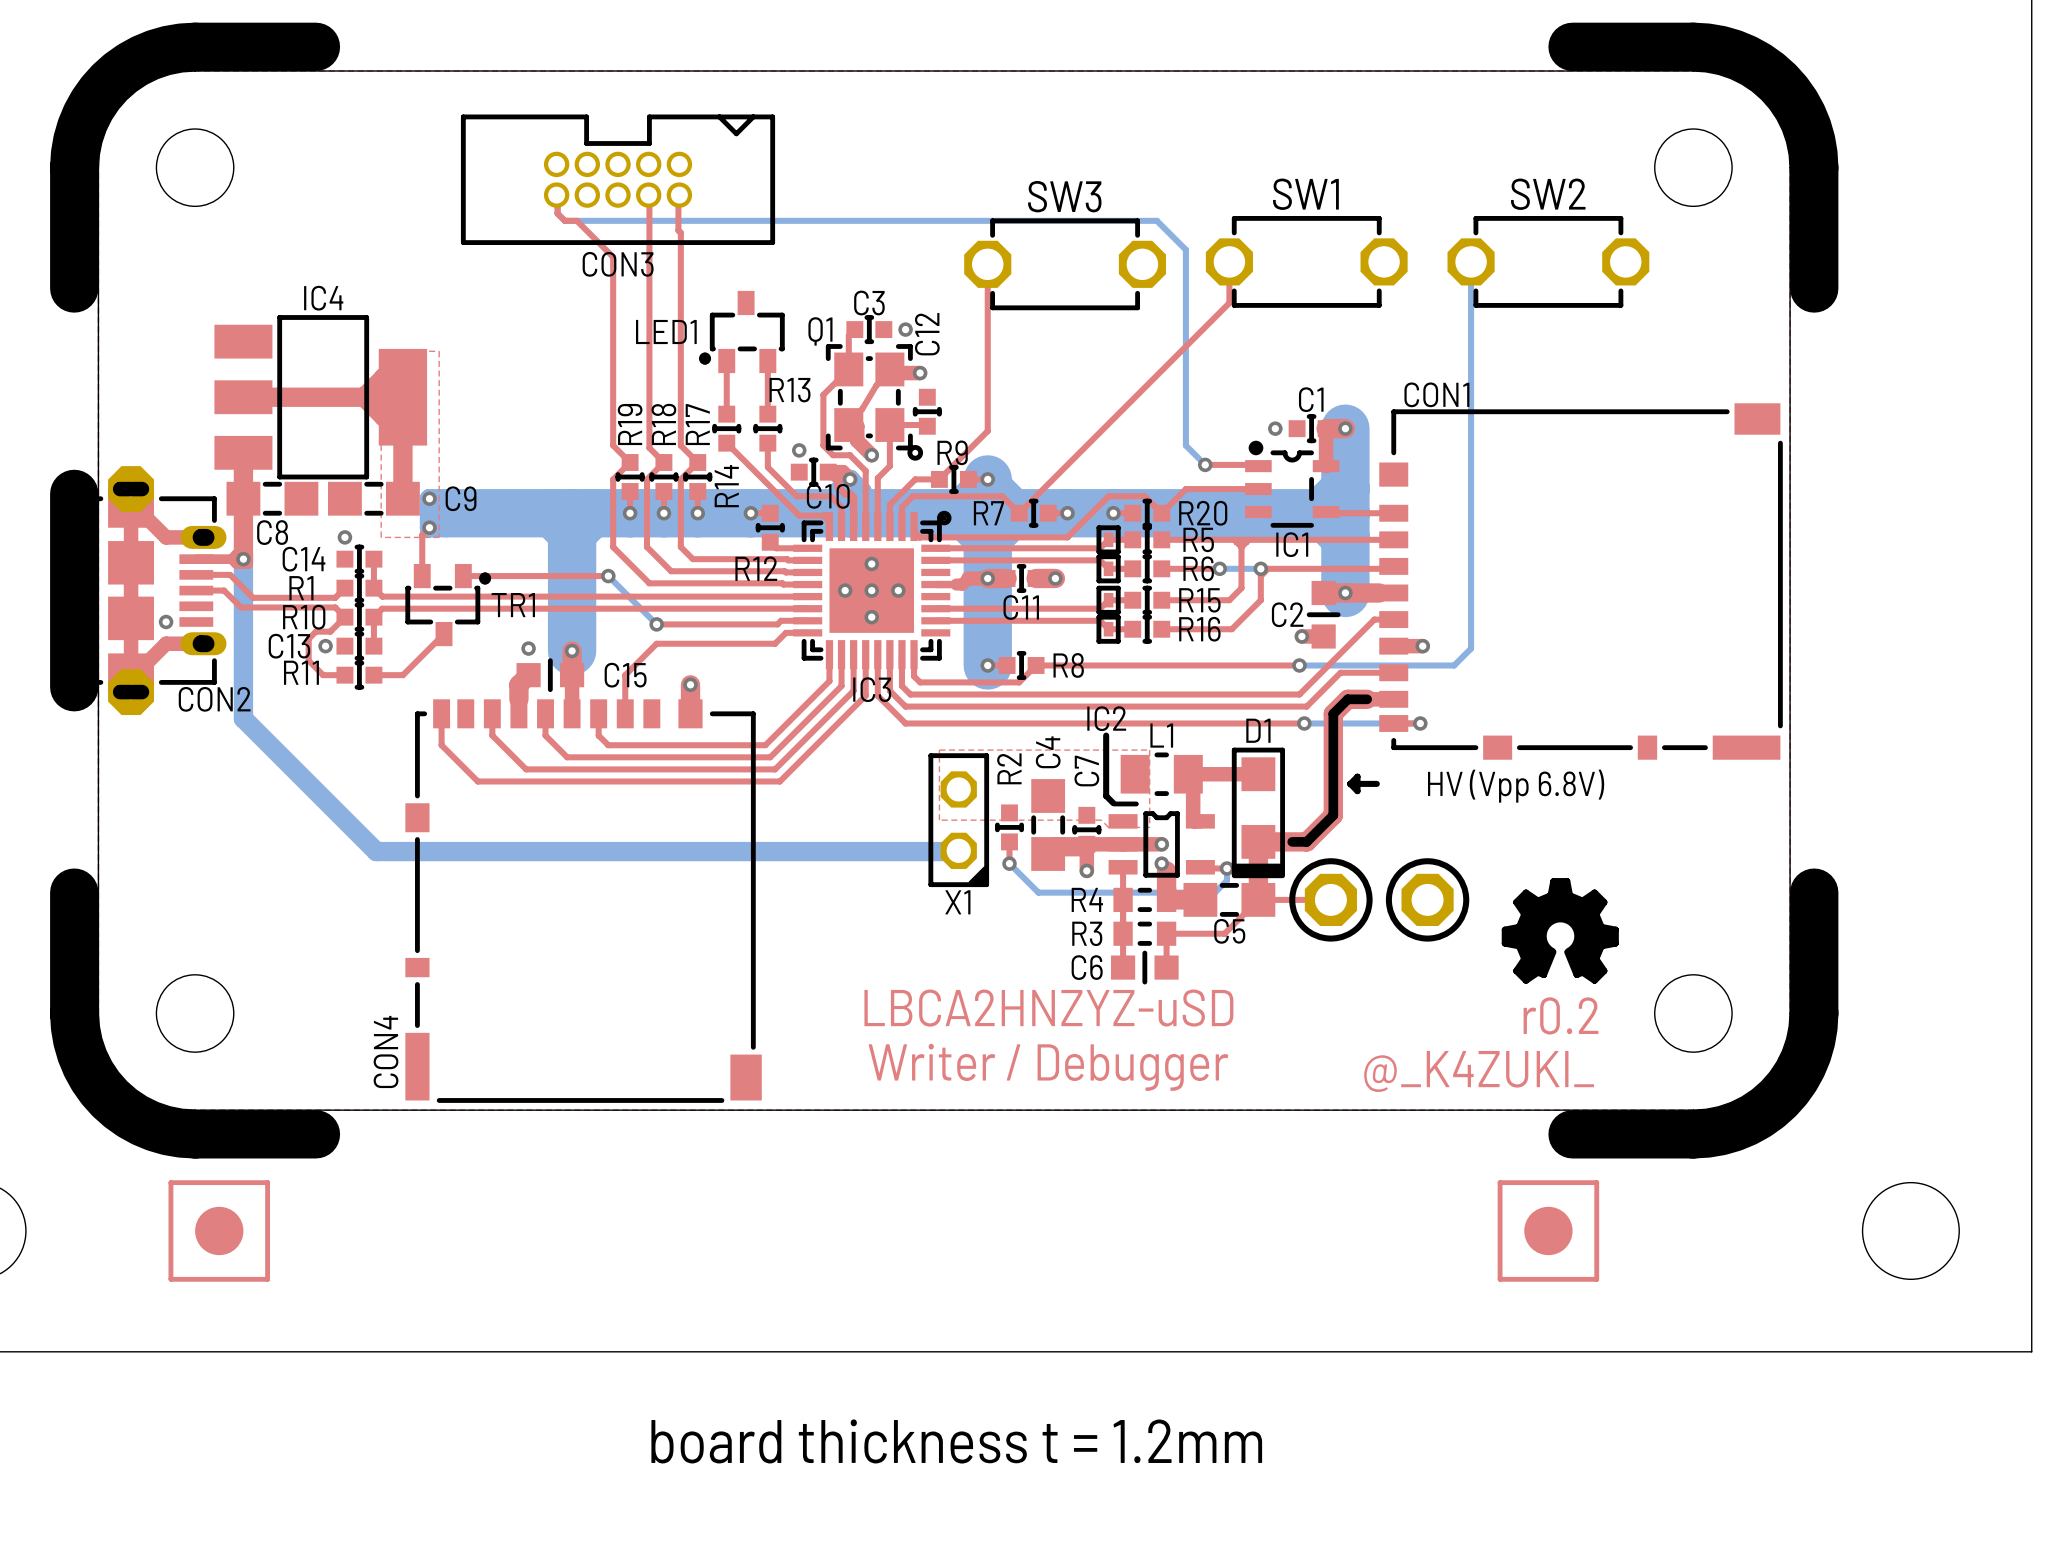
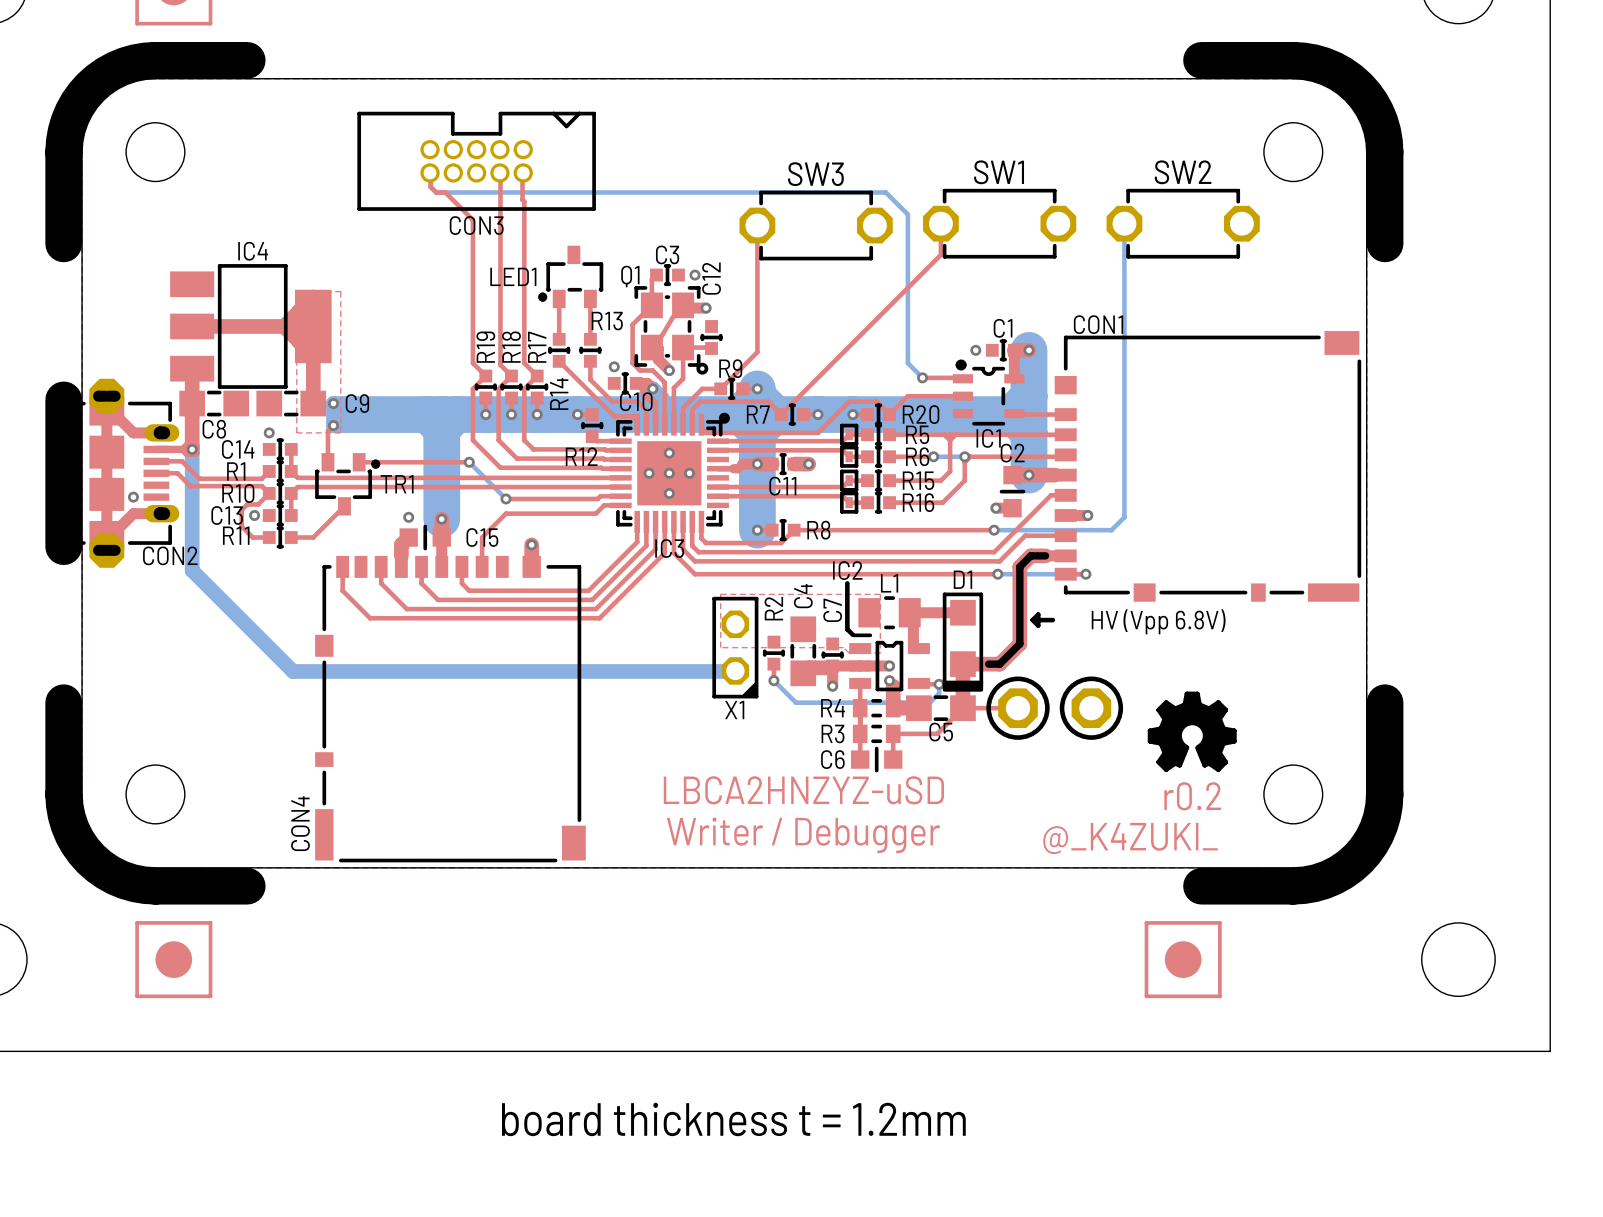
C2 name position: C2 (1287, 614) -> C2 (1012, 453)

